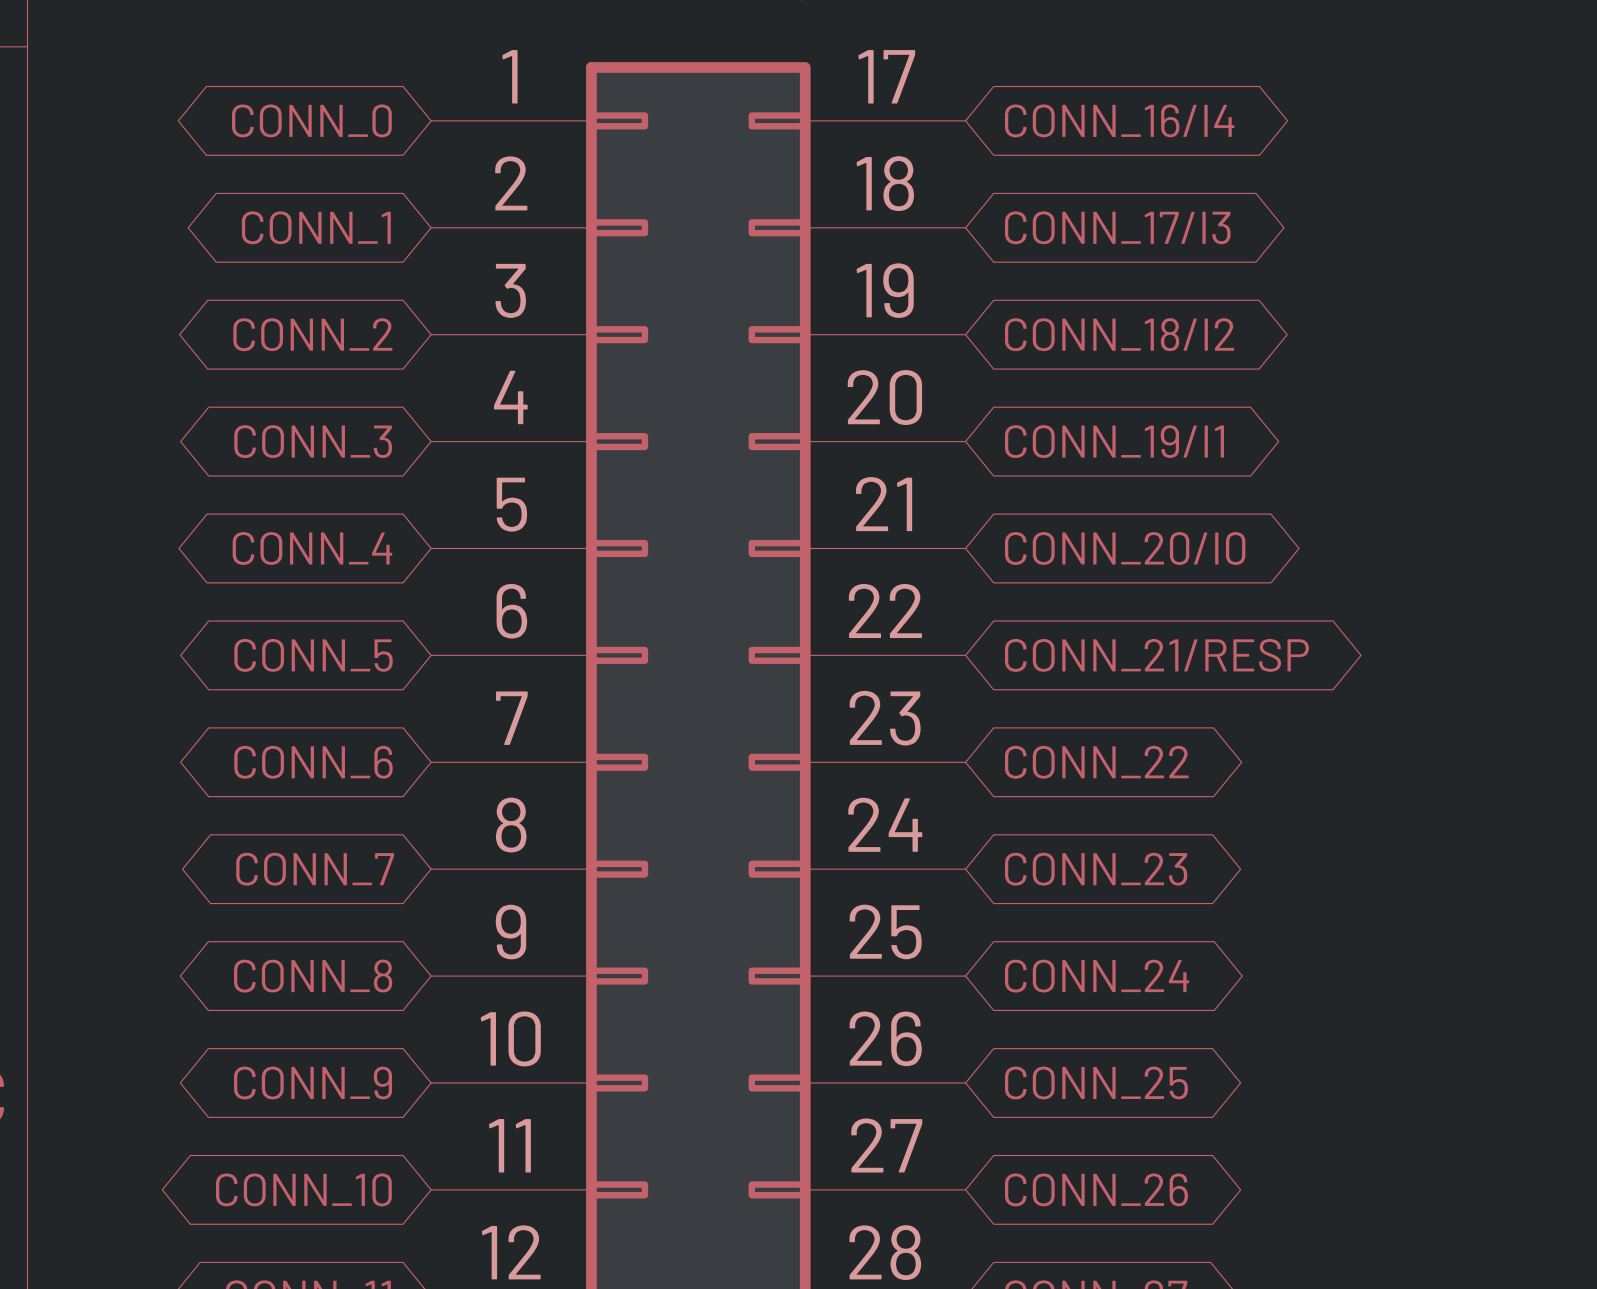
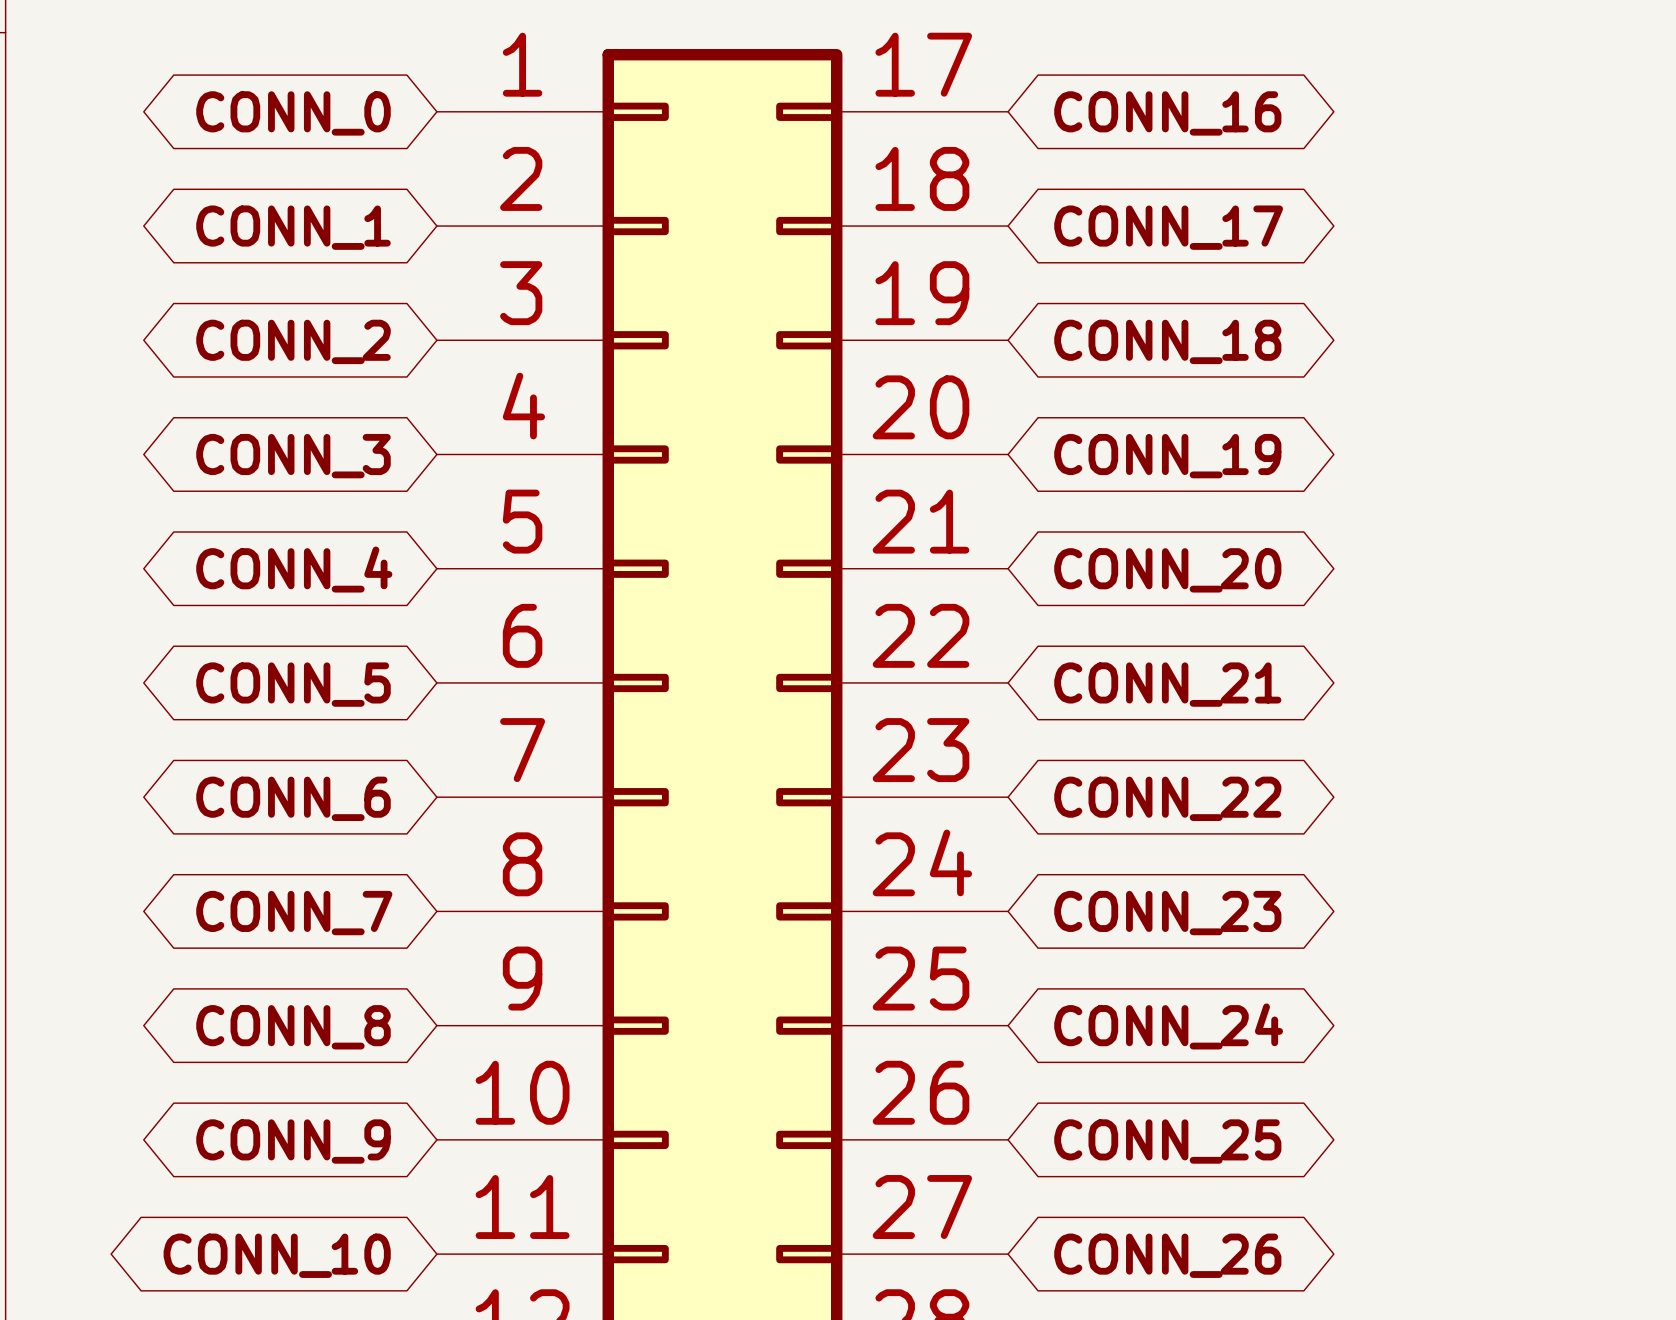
global label: CONN_16/I4 (1119, 120) -> CONN_16 (1167, 113)
global label: CONN_17/I3 (1117, 227) -> CONN_17 (1168, 227)
global label: CONN_18/I2 (1119, 334) -> CONN_18 (1167, 341)
global label: CONN_19/I1 (1114, 441) -> CONN_19 (1167, 456)
global label: CONN_20/I0 (1125, 548) -> CONN_20 (1167, 570)
global label: CONN_21/RESP (1156, 655) -> CONN_21 (1167, 684)

